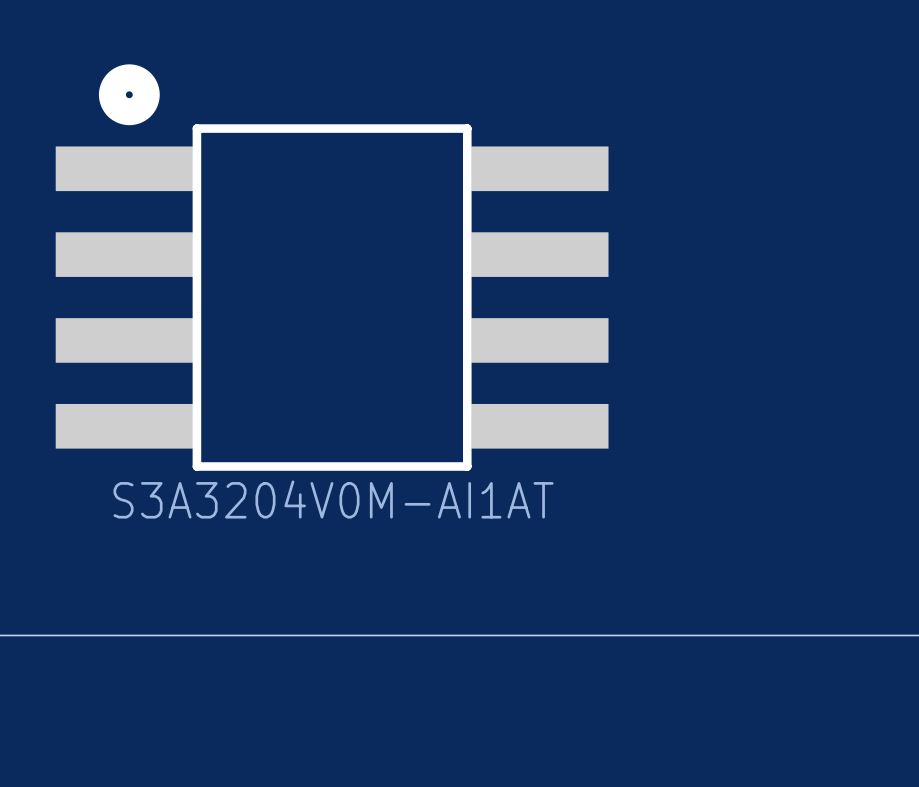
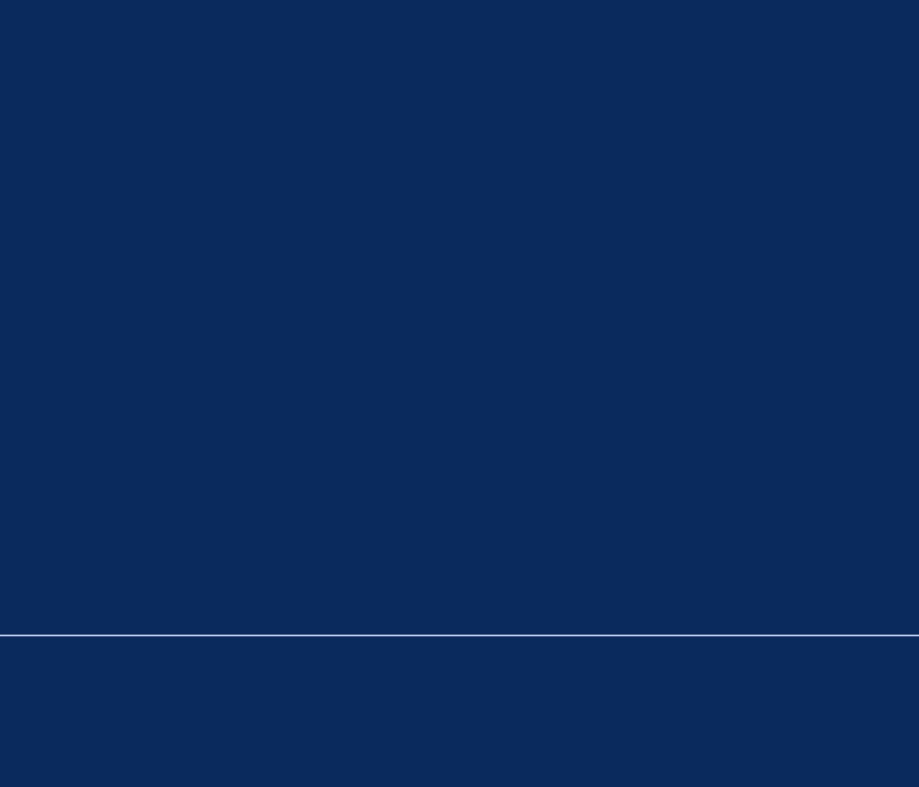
part: S3A3204V0M-AI1AT (332, 267) -> none

